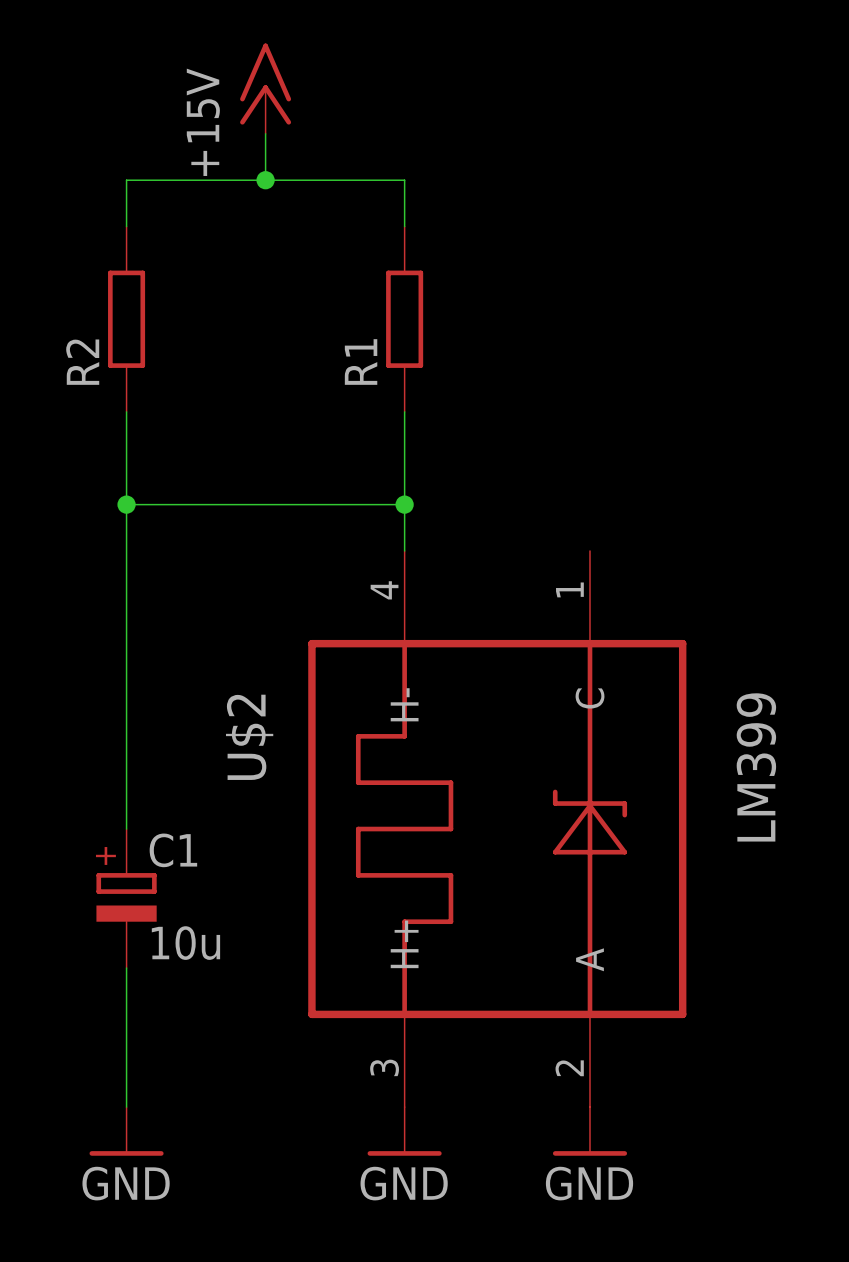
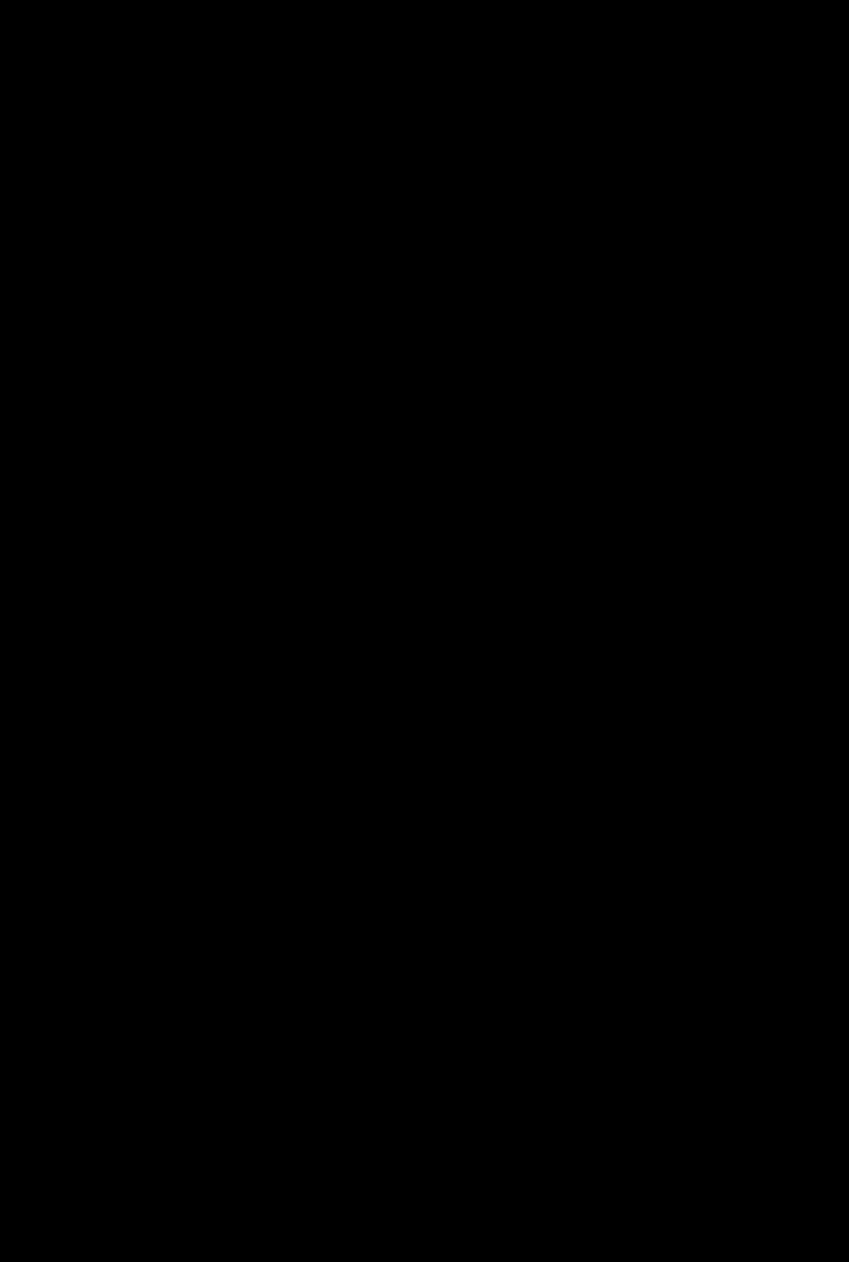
power symbol: +15V (265, 88) -> none
wire: (265, 133) (265, 180) -> none
junction: (265, 180) -> none
wire: (126, 226) (126, 180) (404, 180) (404, 226) -> none
R2: (126, 319) -> none
R1: (404, 319) -> none
wire: (126, 411) (126, 829) -> none
wire: (404, 411) (404, 550) -> none
wire: (126, 504) (404, 504) -> none
junction: (126, 504) -> none
junction: (404, 504) -> none
U$2: LM399 (497, 829) -> none
C1: 10u (126, 898) -> none
wire: (126, 968) (126, 1107) -> none
power symbol: GND (126, 1131) -> none
power symbol: GND (404, 1131) -> none
power symbol: GND (589, 1131) -> none

